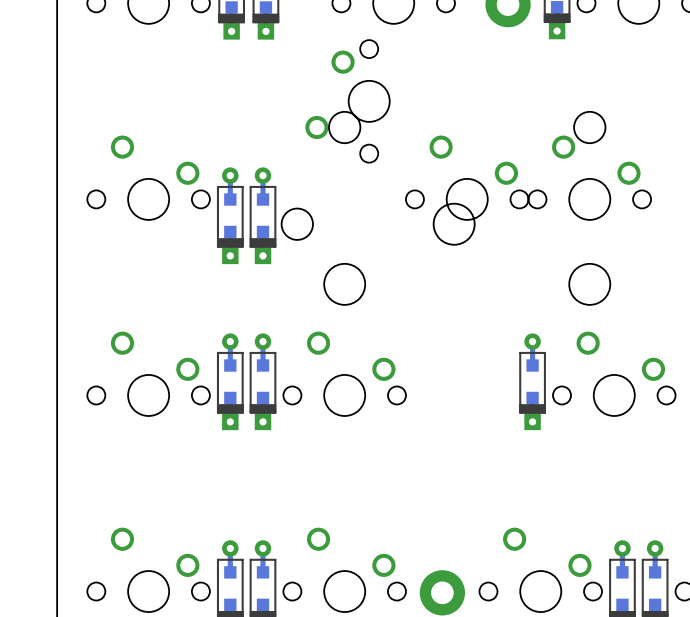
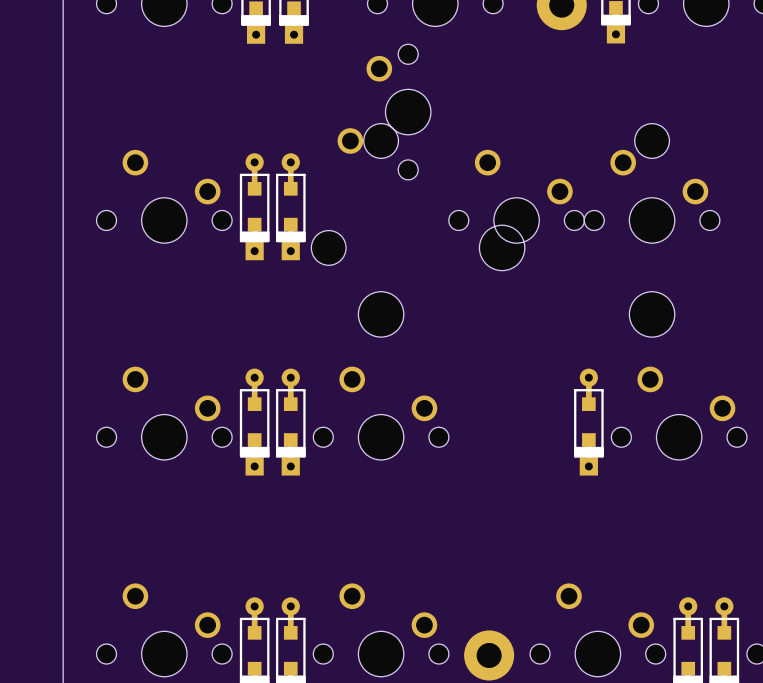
part: none -> (254, 206)
part: none -> (290, 206)
part: (230, 215) -> none
part: (262, 215) -> none

